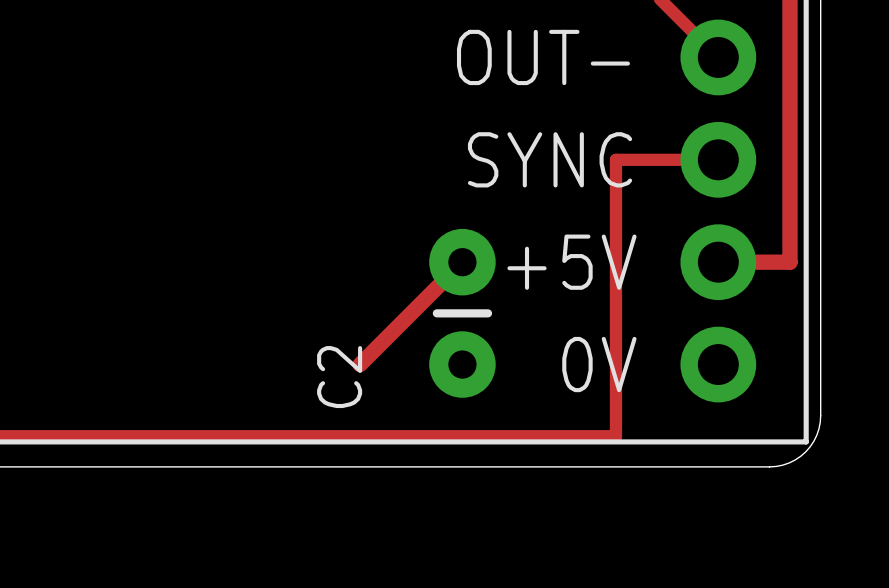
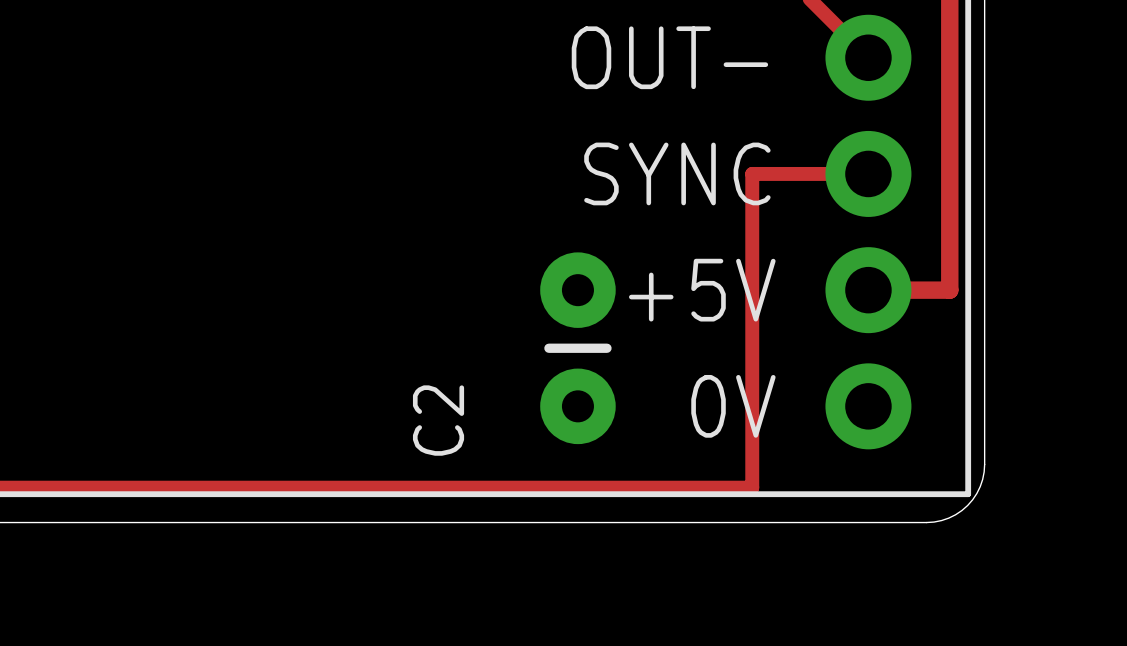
track: (462, 262) (360, 364) -> none

